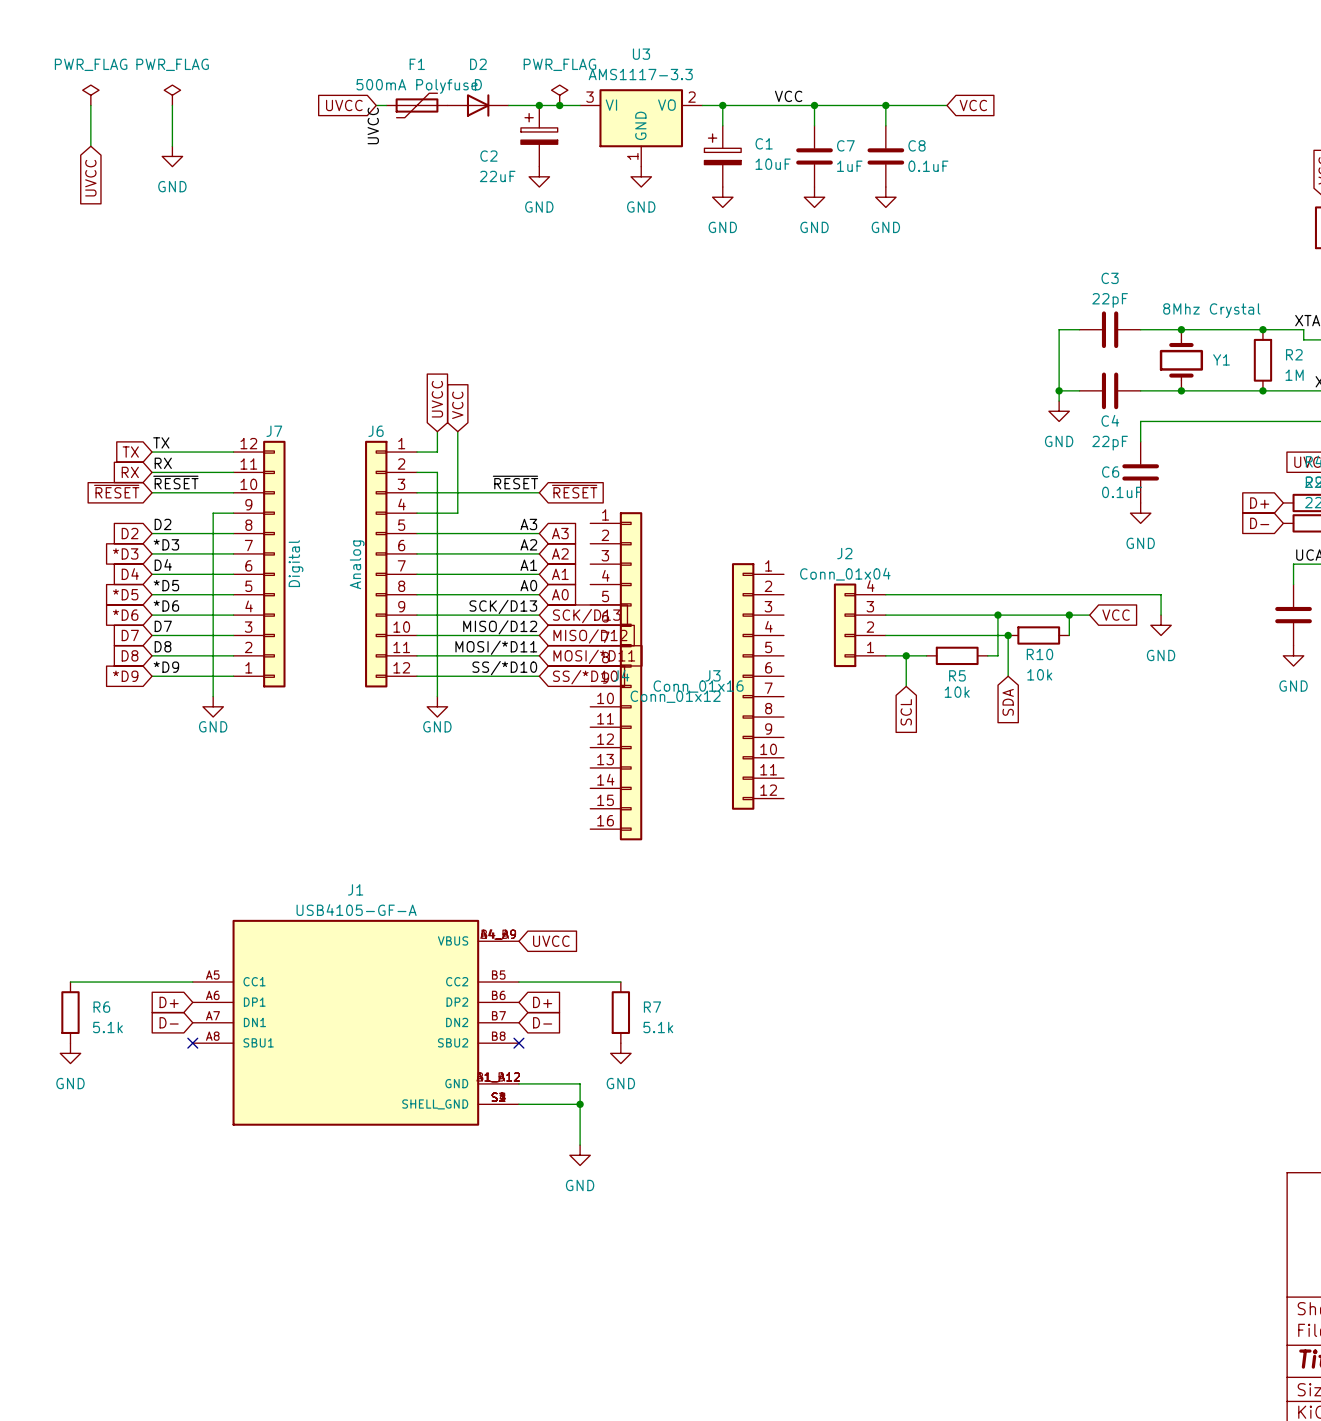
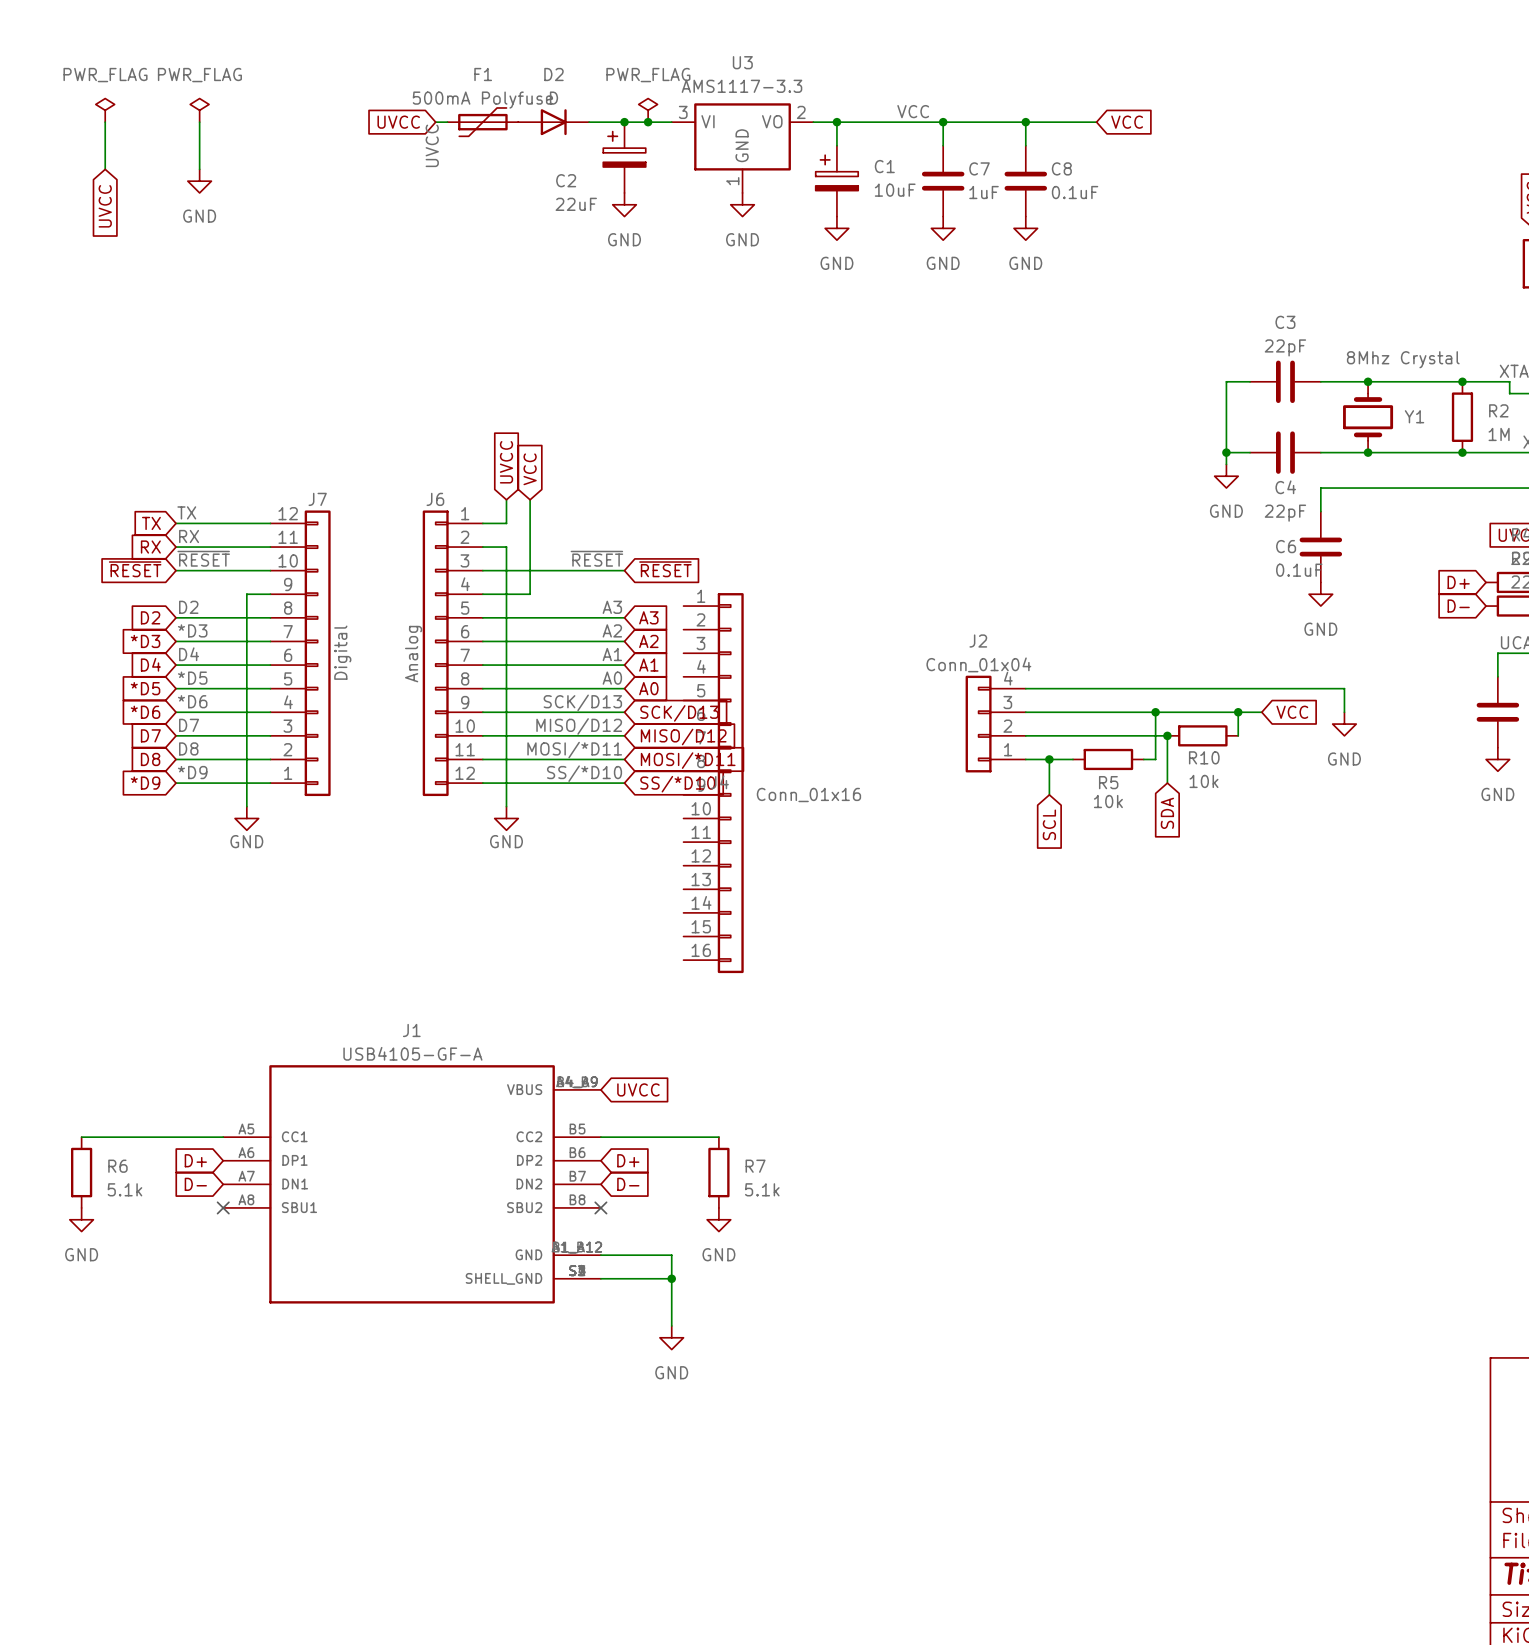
J3: Conn_01x12 (757, 686) -> none

